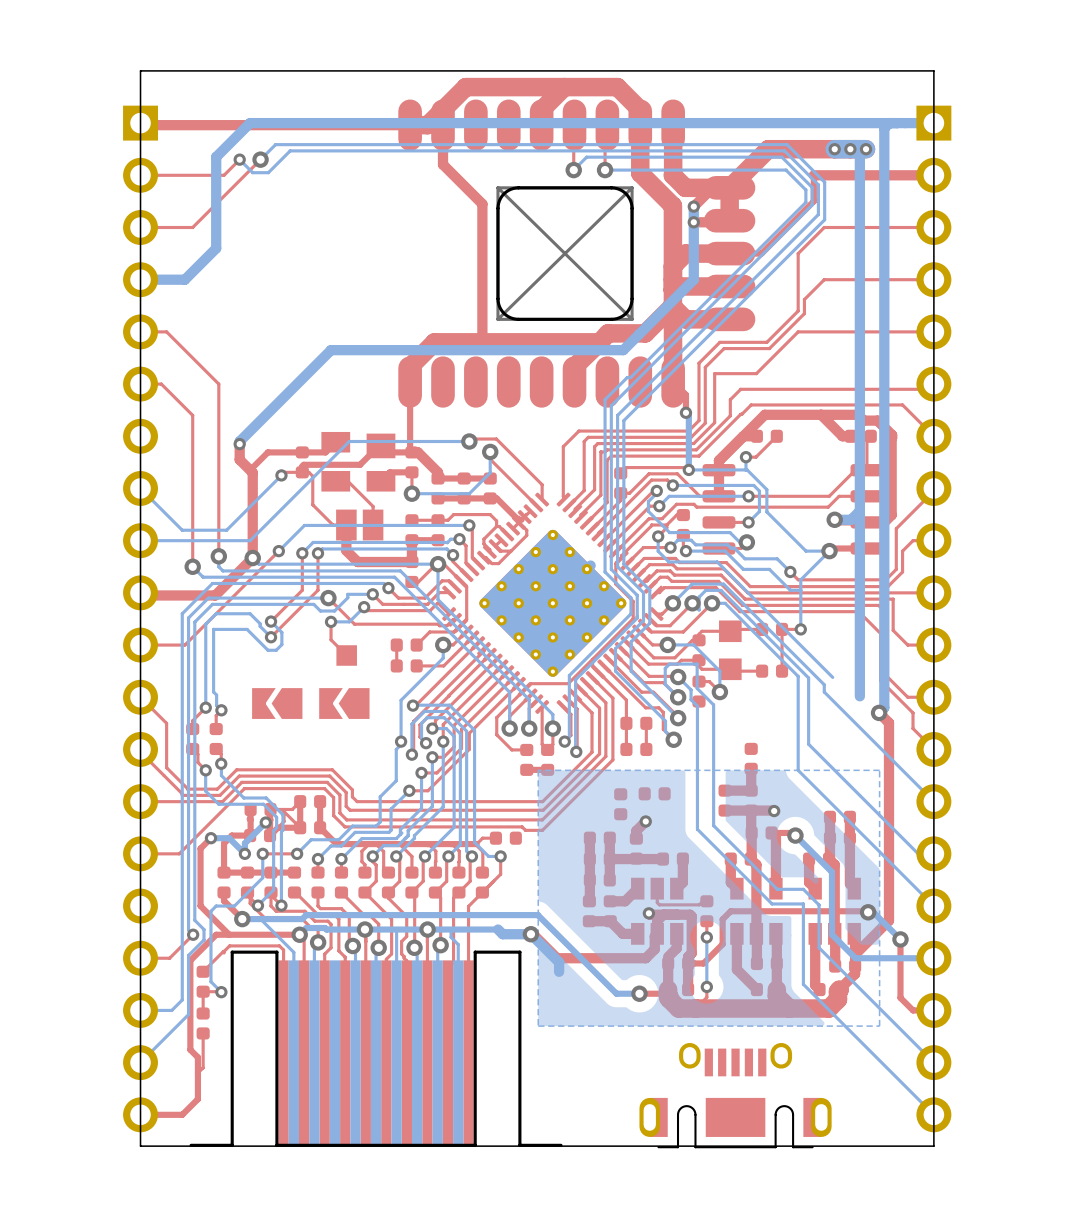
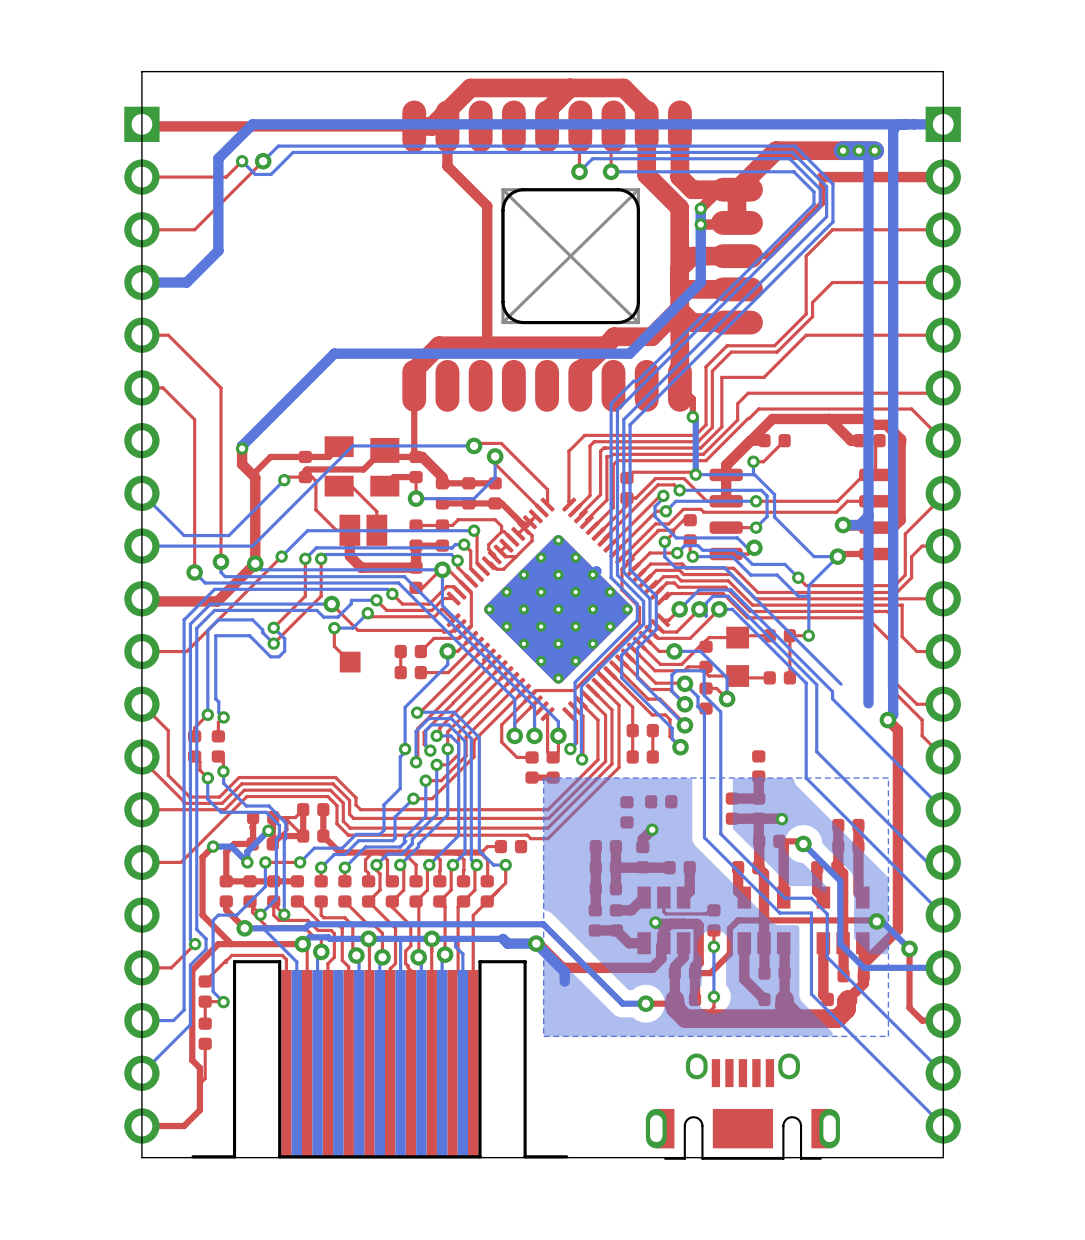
part: (277, 703) -> none
part: (344, 703) -> none

